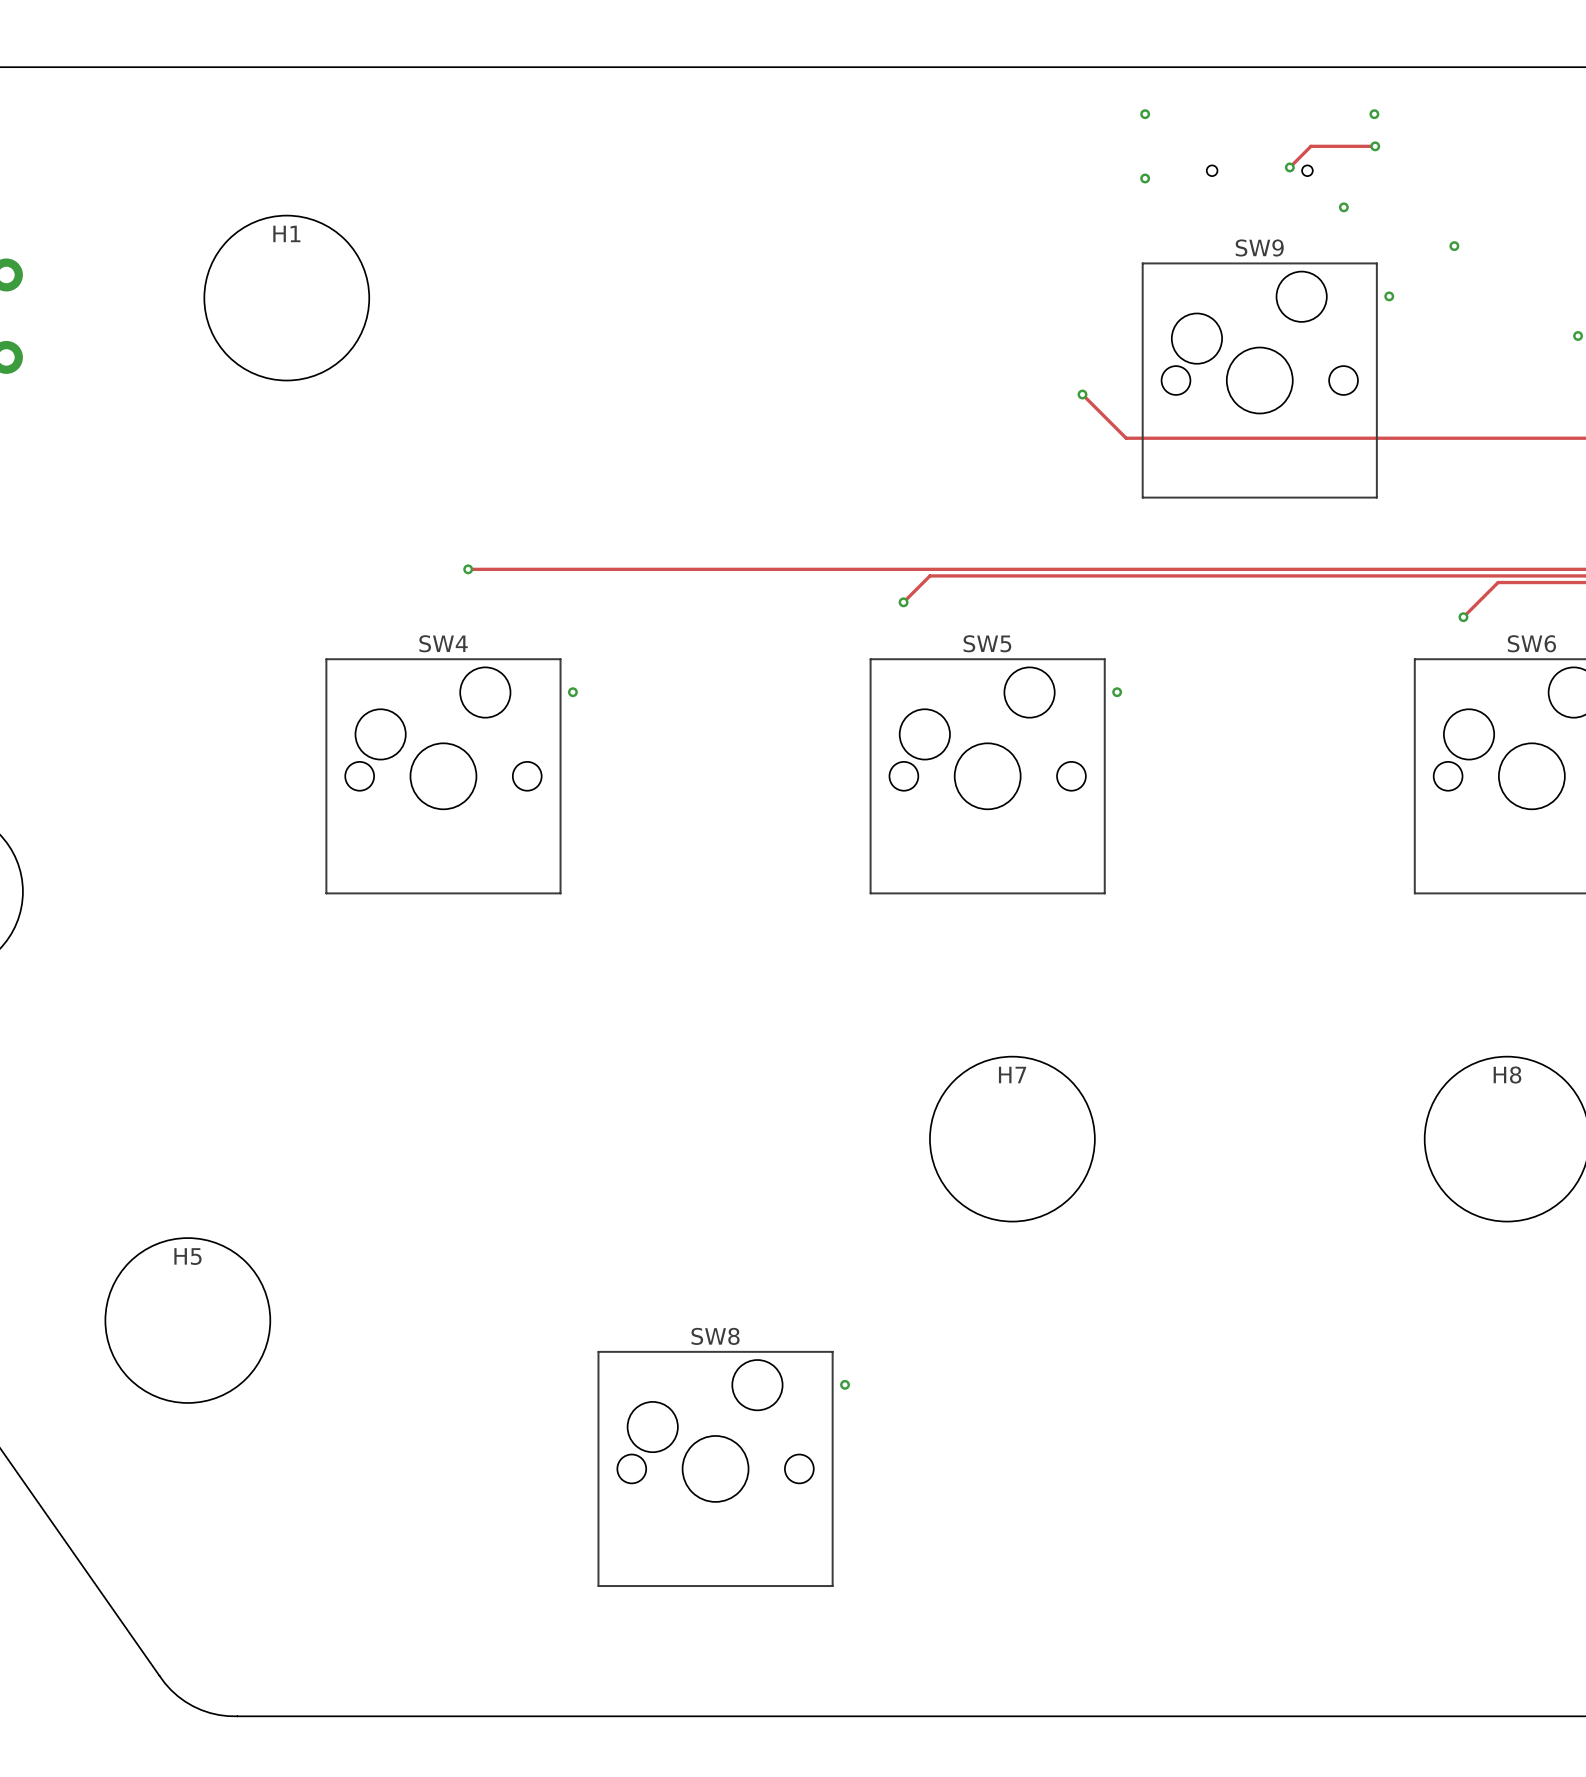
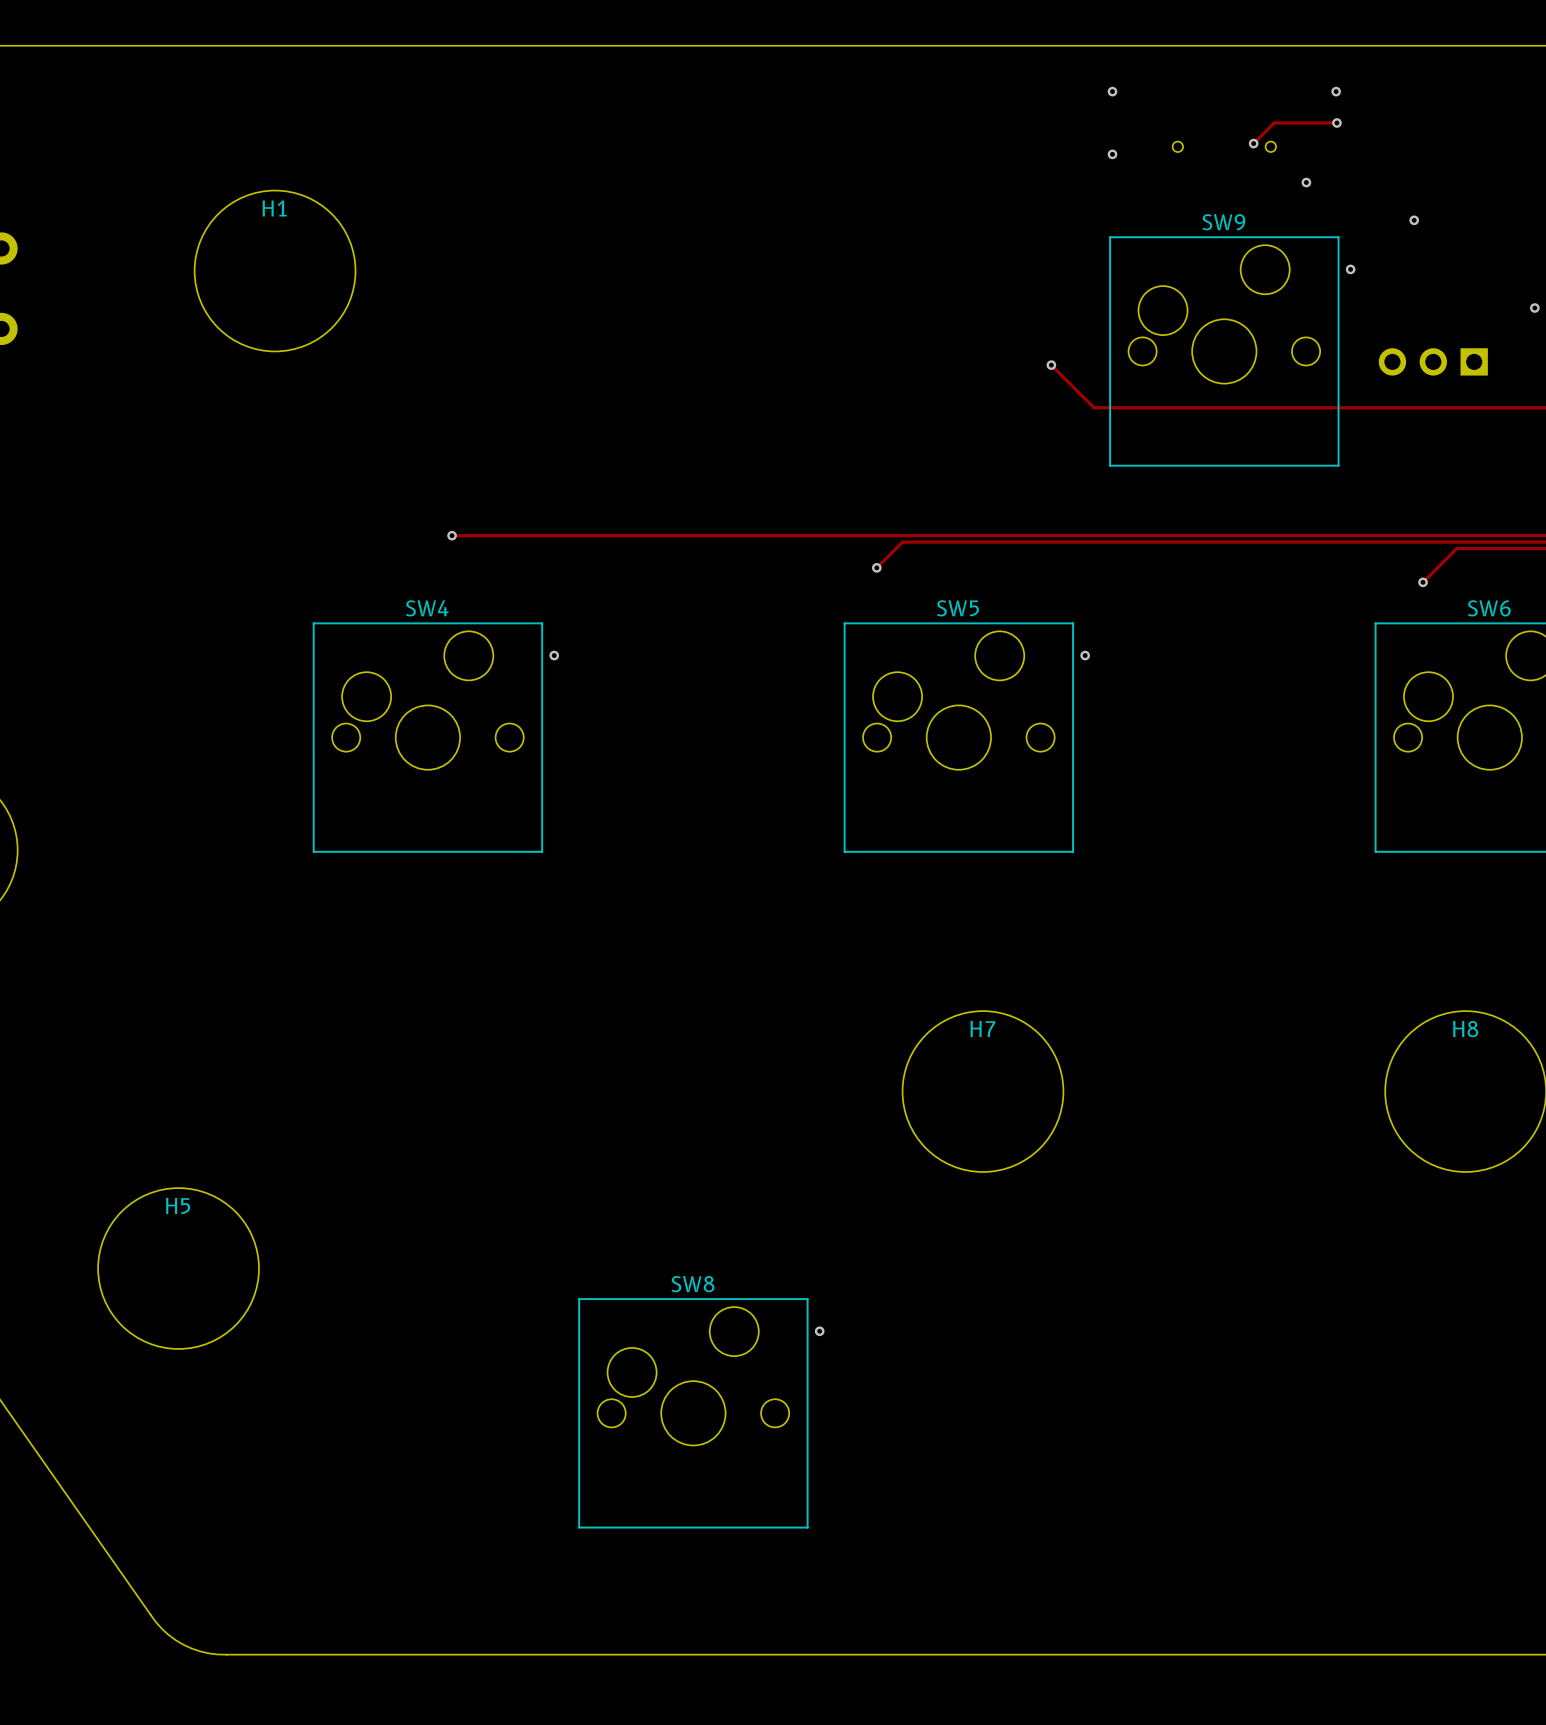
part: none -> (1433, 361)

